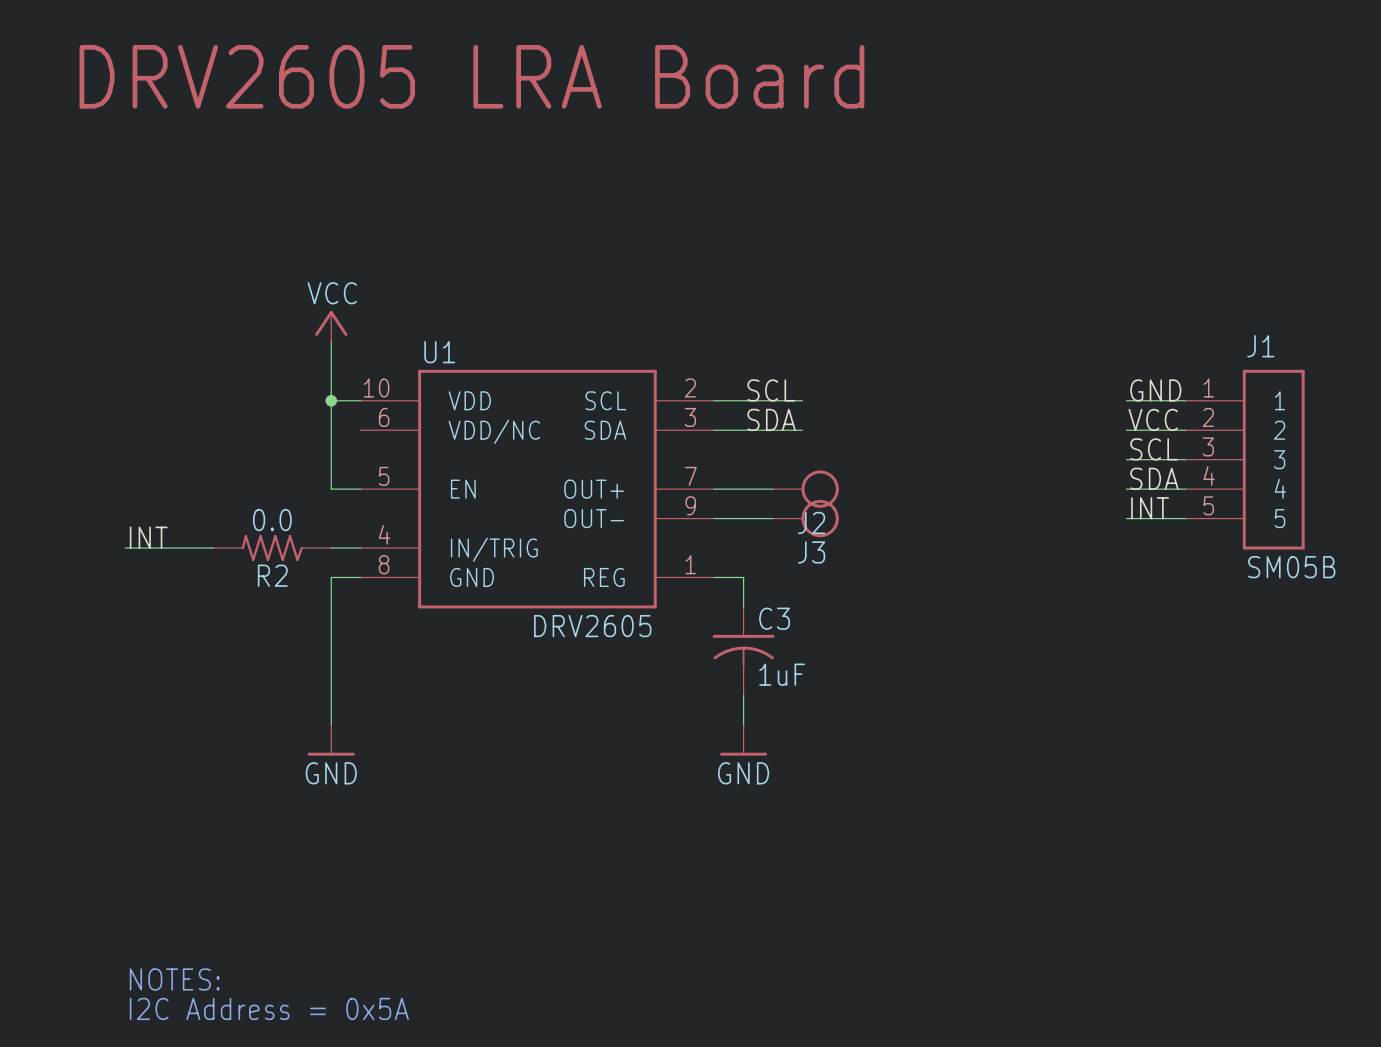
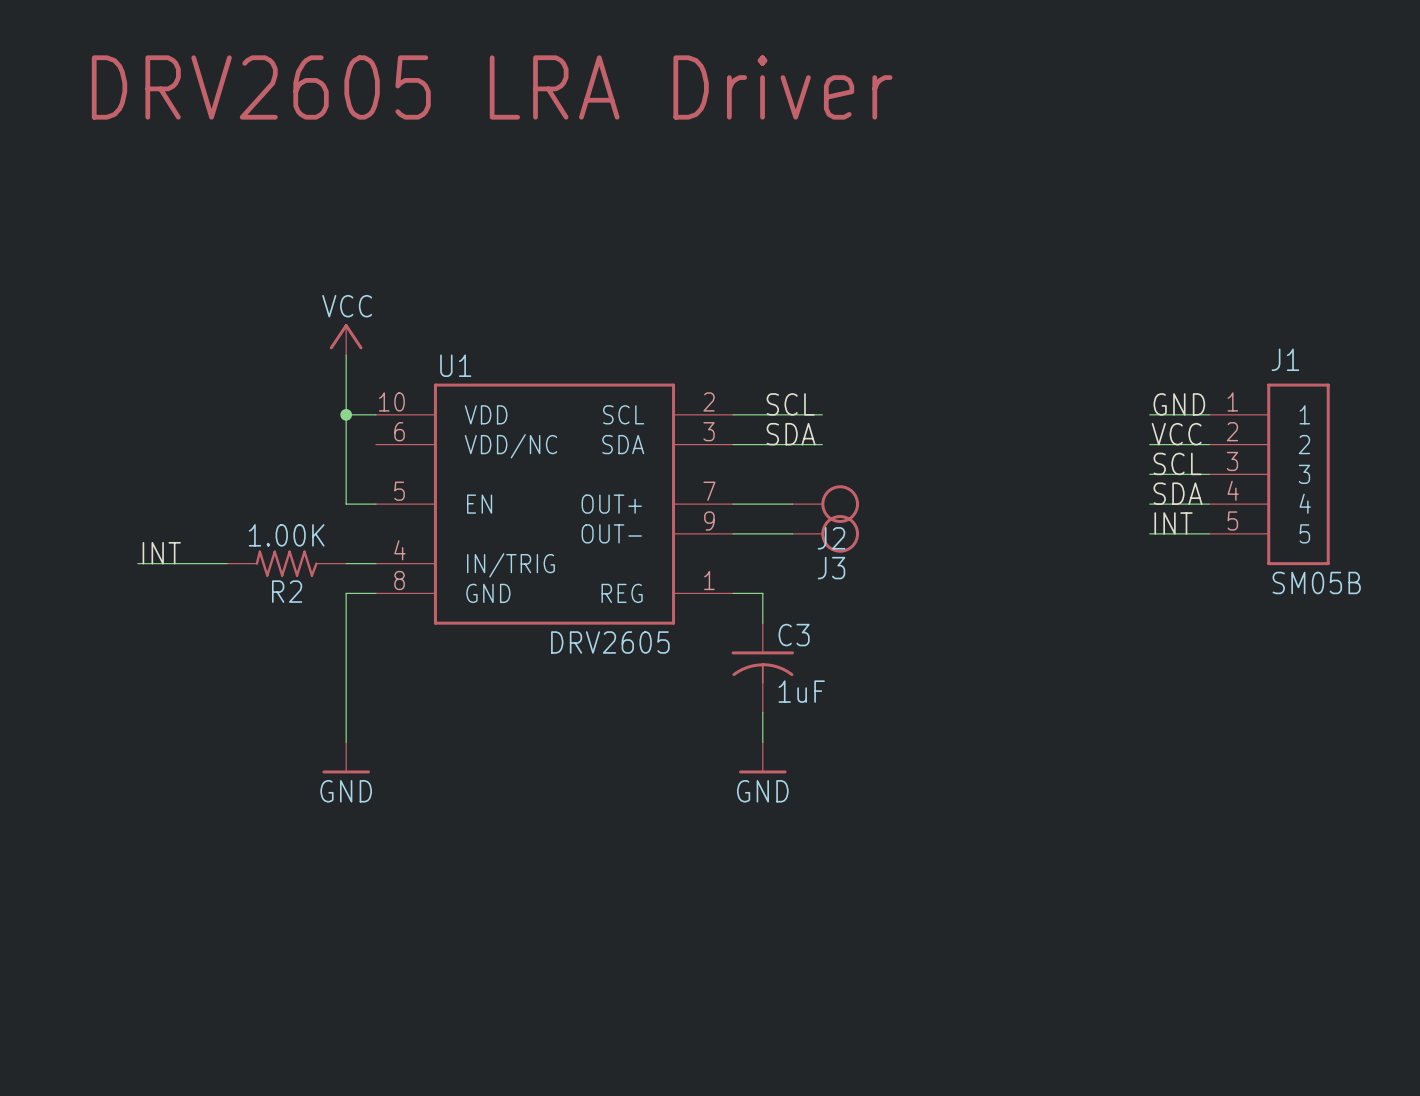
text: DRV2605 LRA Board (471, 76) -> DRV2605 LRA Driver (492, 87)
R2 value: 0.0 (272, 520) -> 1.00K (286, 535)
text: NOTES: (174, 979) -> none
text: I2C Address = 0x5A (269, 1008) -> none

